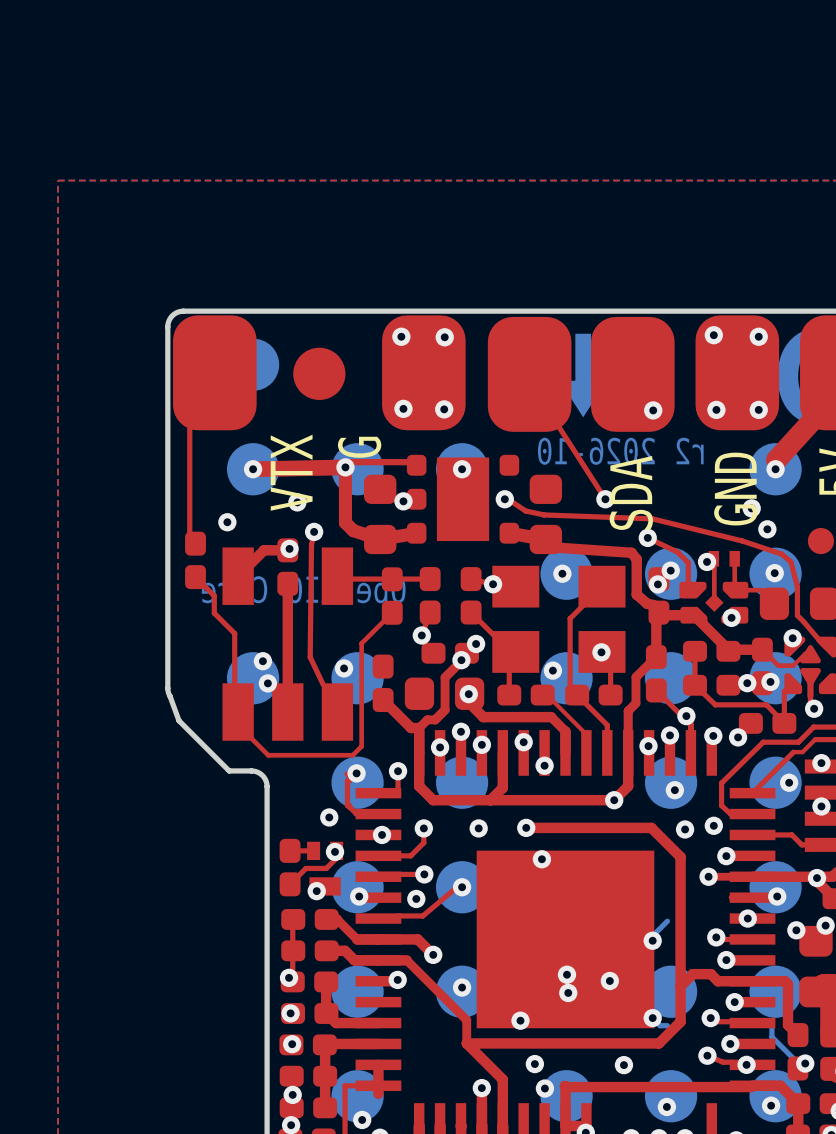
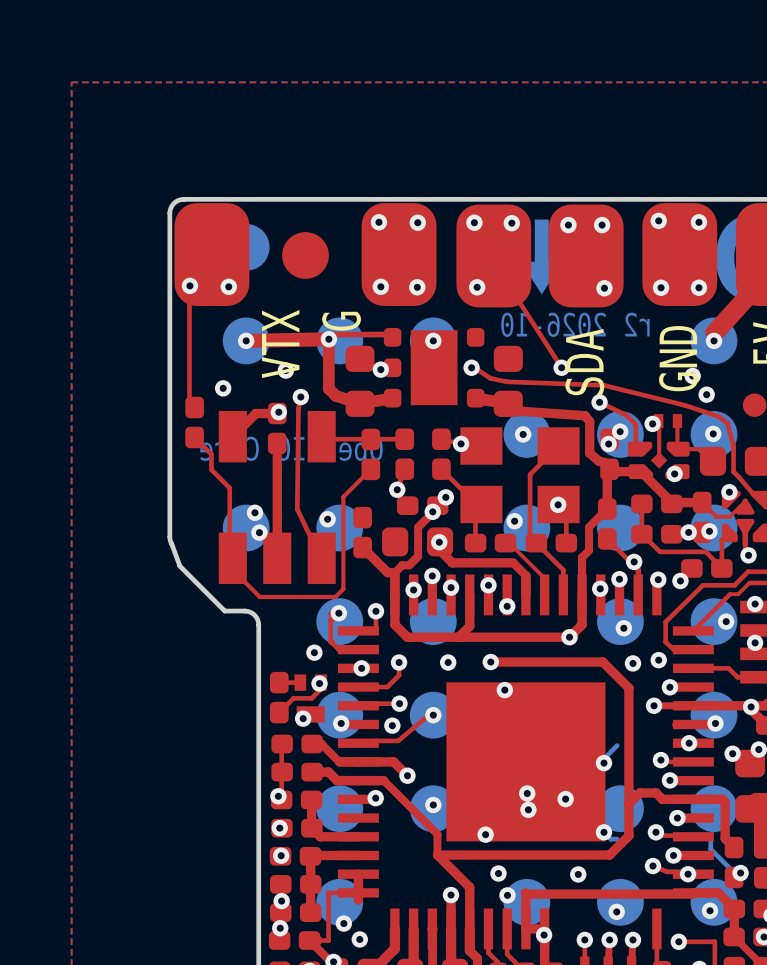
via: none -> (474, 222)
via: none -> (511, 223)
via: none -> (568, 225)
via: none -> (602, 225)
via: none -> (189, 285)
via: none -> (228, 286)
via: none -> (477, 287)

